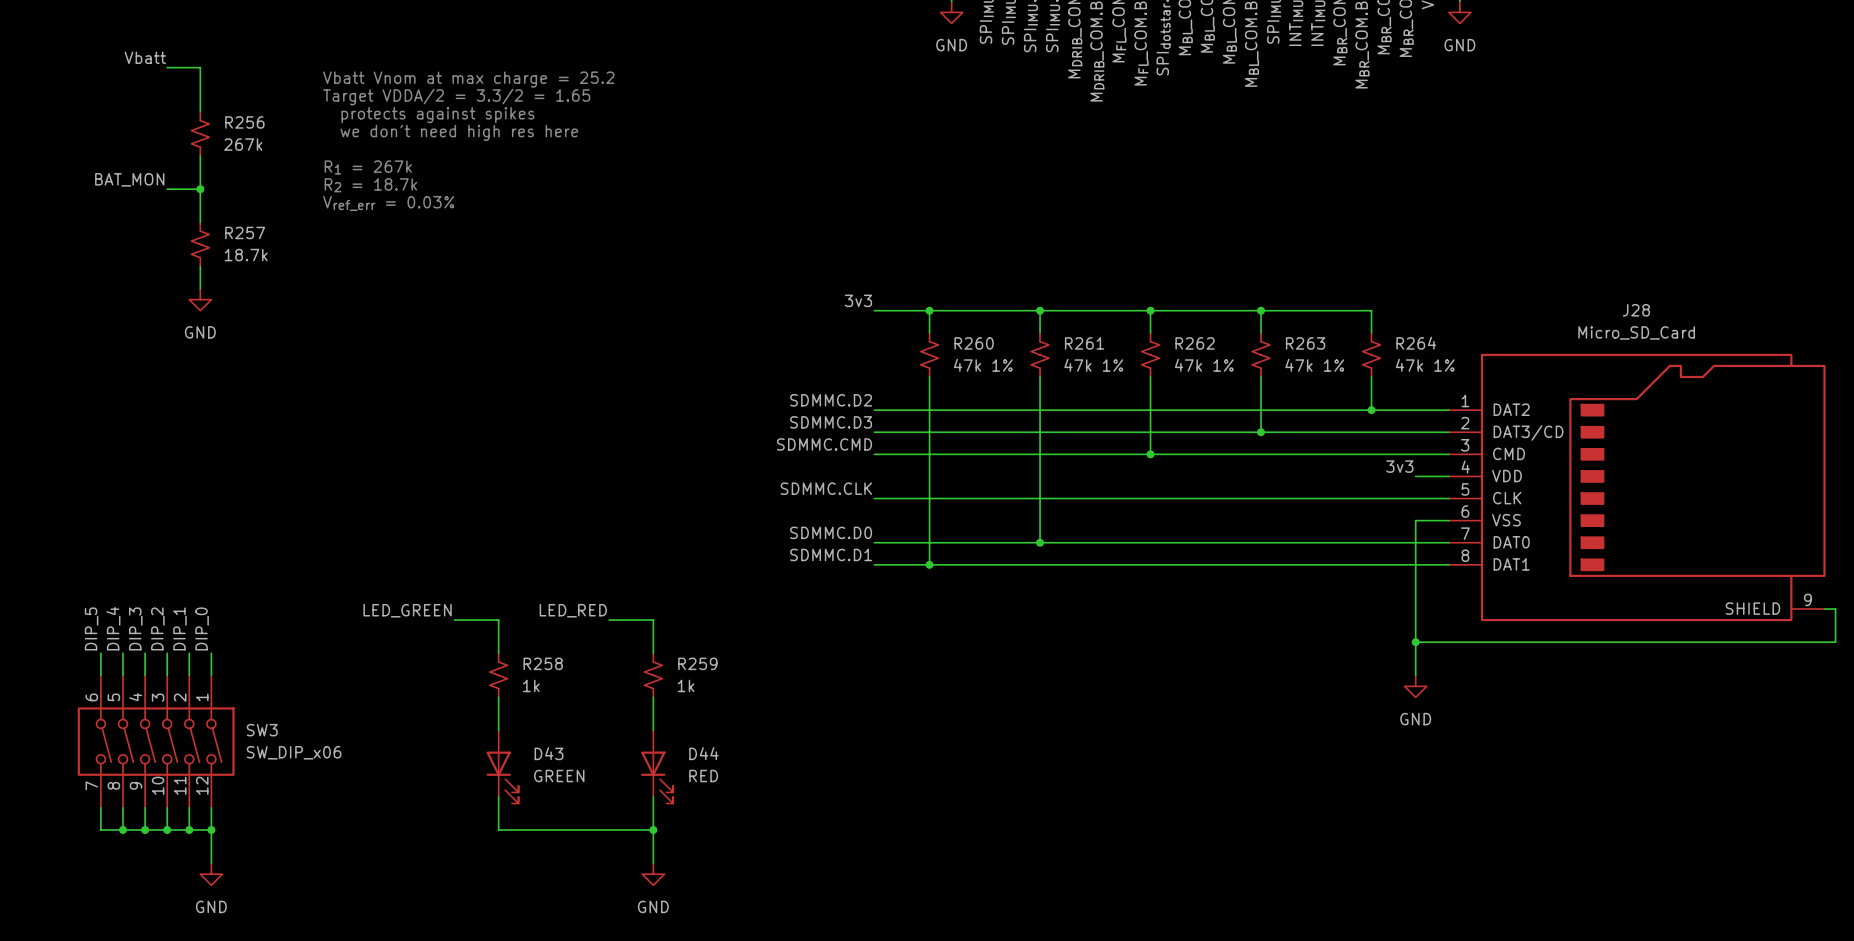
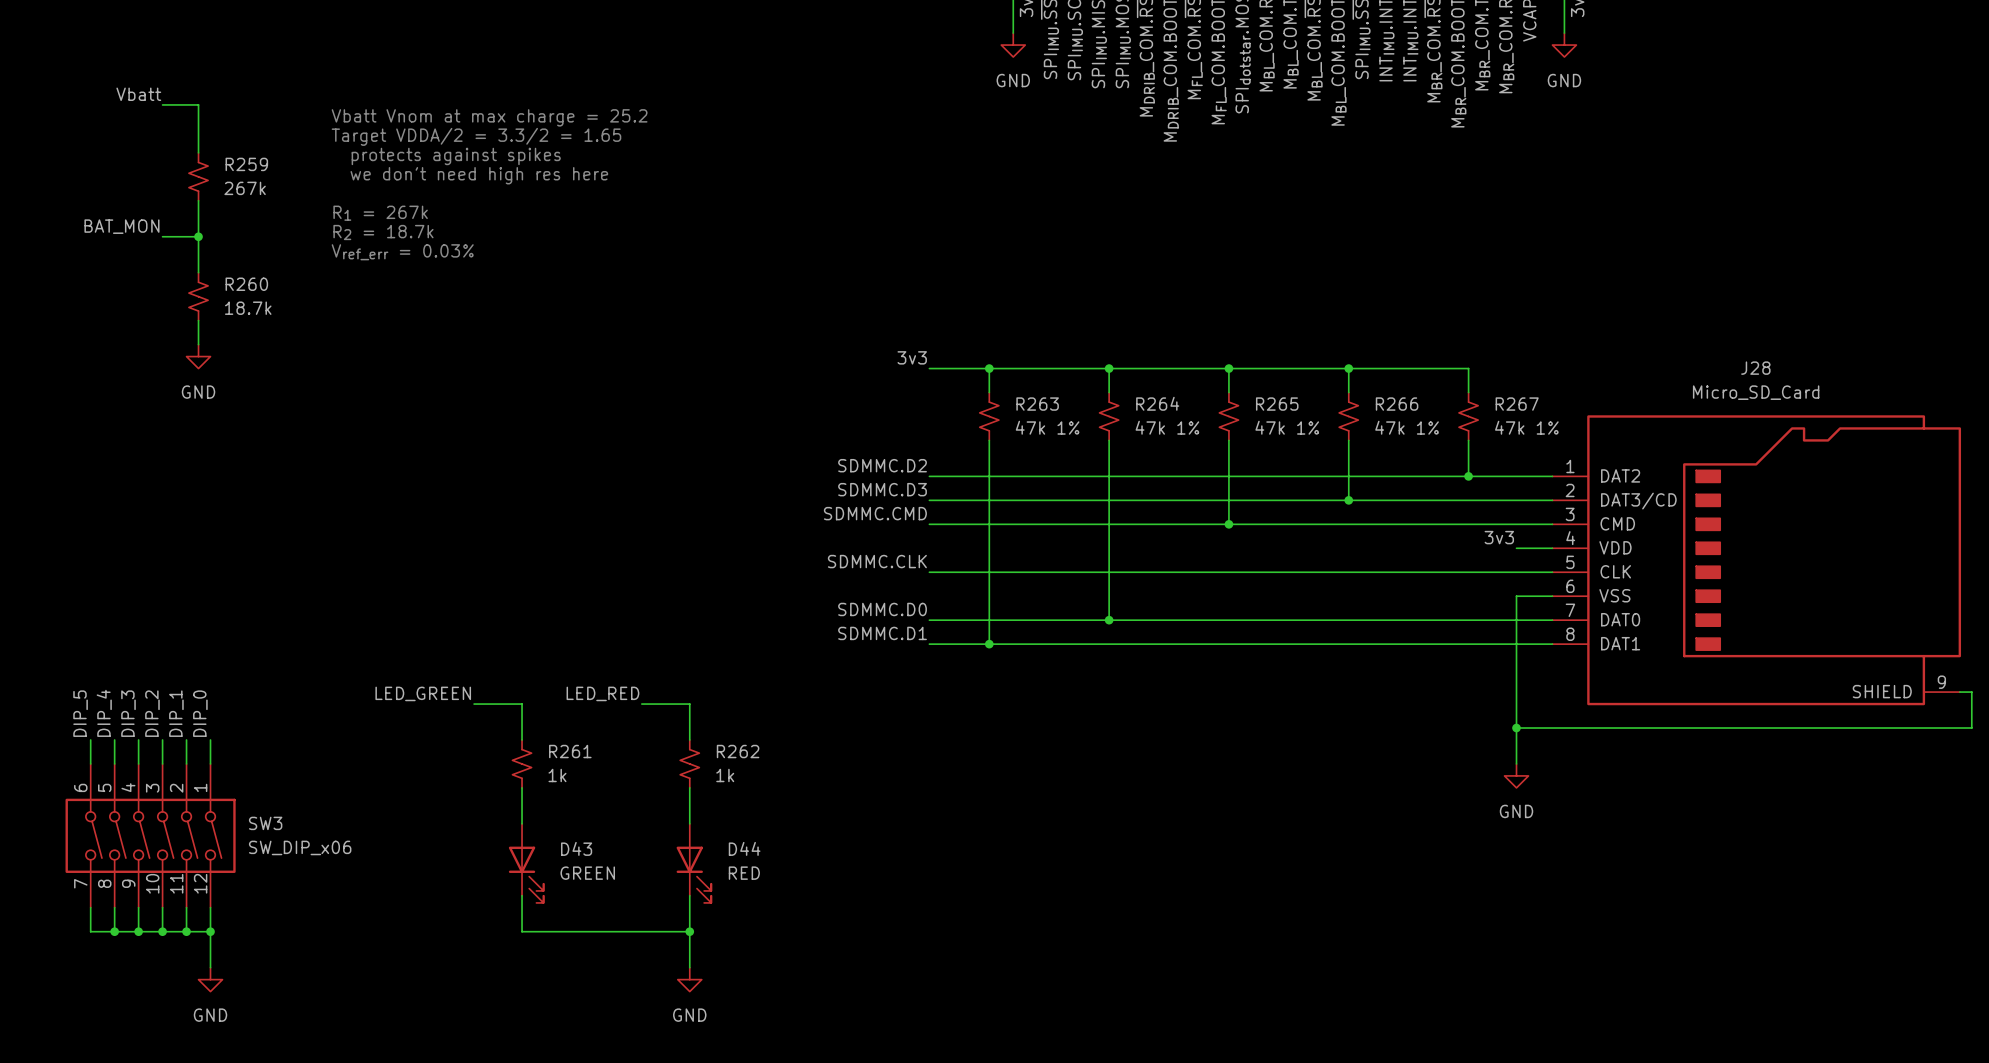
R256 name: R256 (244, 122) -> R259 (246, 164)
R257 name: R257 (245, 232) -> R260 (246, 284)
R260 name: R260 (974, 343) -> R263 (1037, 404)
R261 name: R261 (1084, 343) -> R264 (1157, 403)
R262 name: R262 (1195, 343) -> R265 (1277, 404)
R263 name: R263 (1305, 343) -> R266 (1397, 404)
R264 name: R264 (1416, 343) -> R267 (1517, 404)
R258 name: R258 (543, 663) -> R261 (570, 751)
R259 name: R259 (697, 663) -> R262 (738, 751)

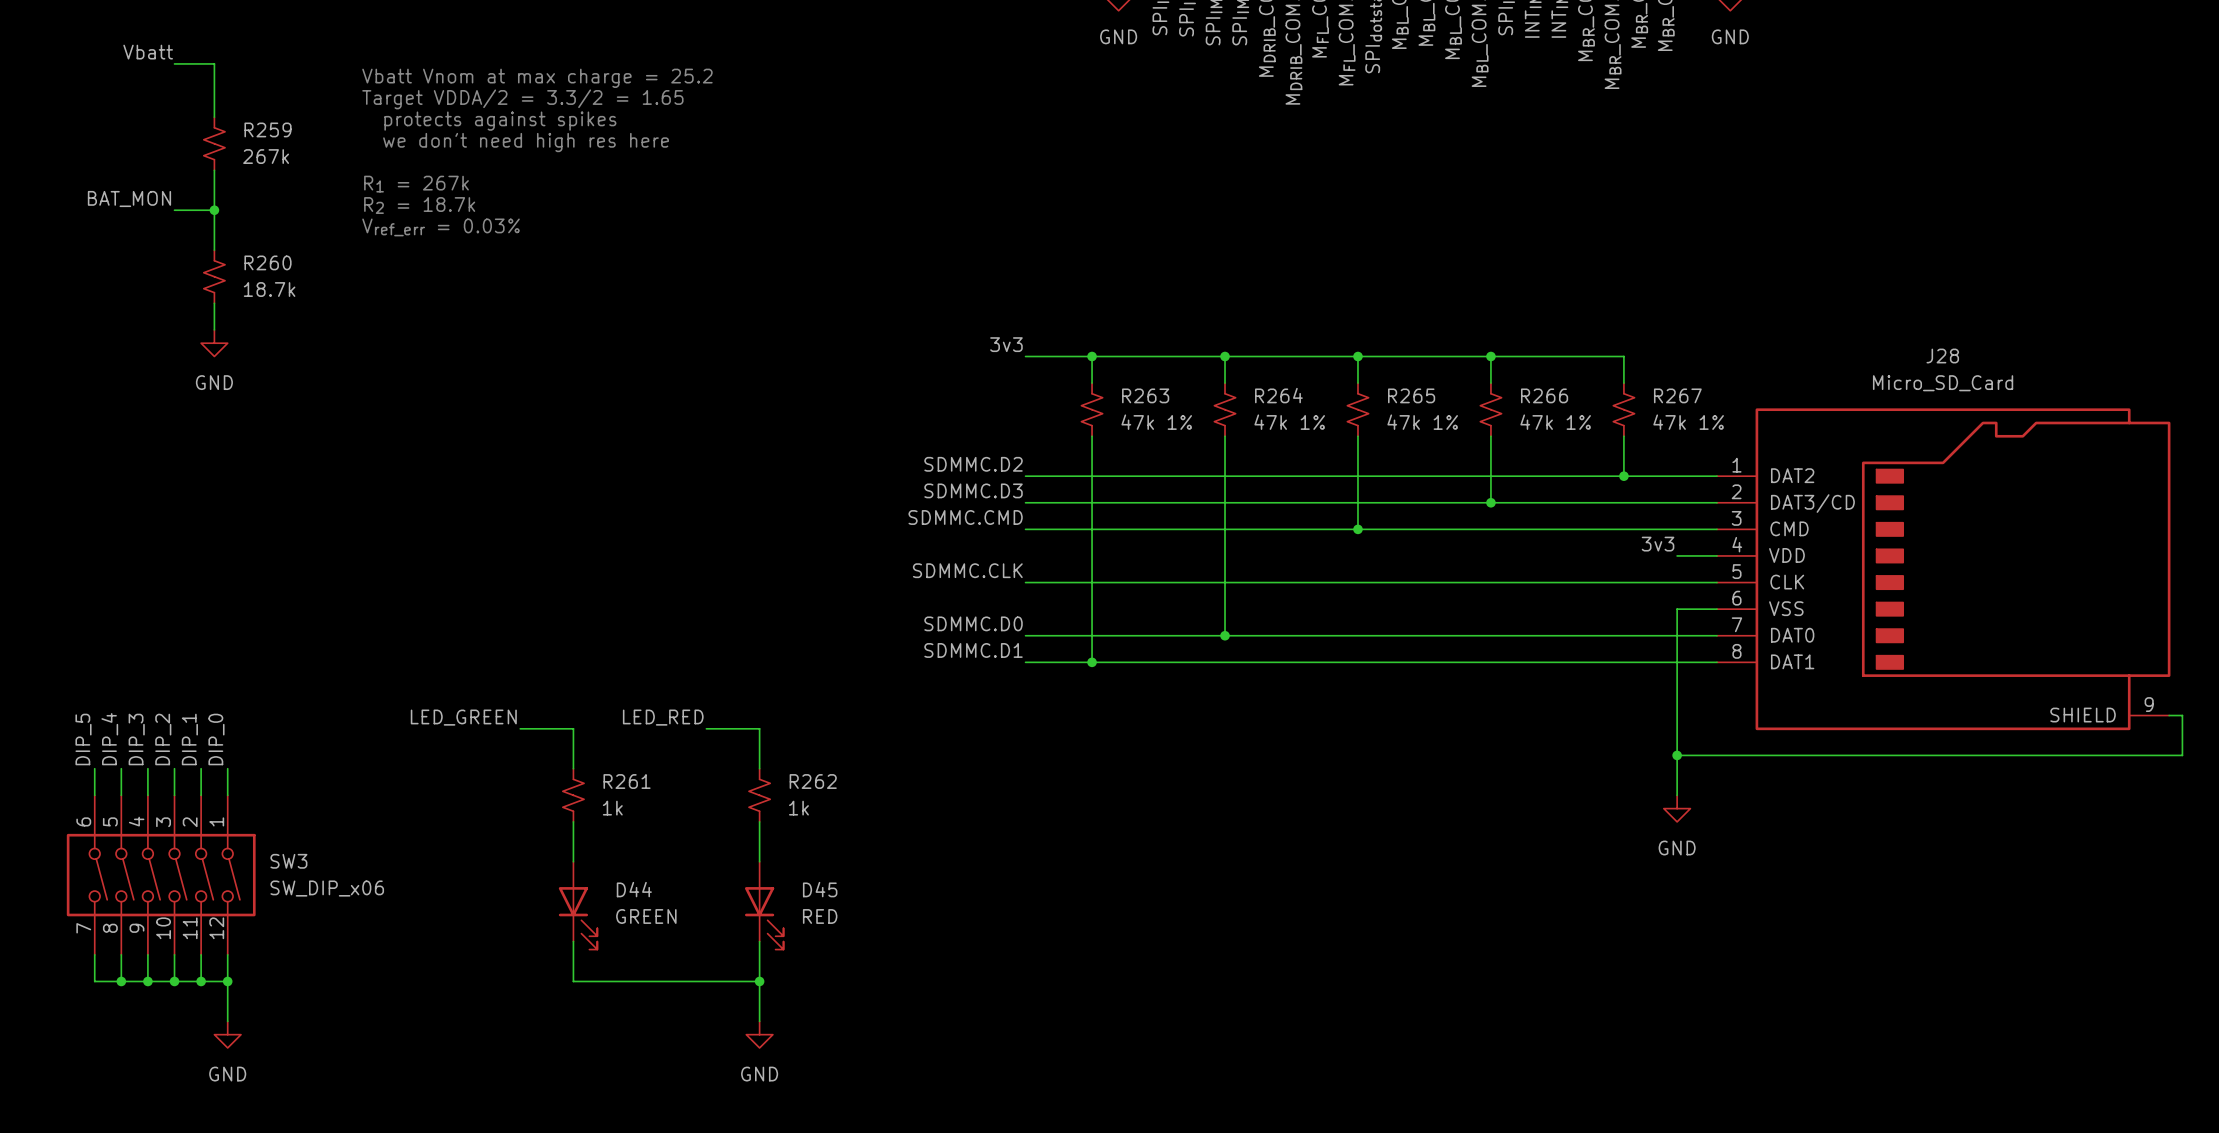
D43 name: D43 (576, 848) -> D44 (634, 889)
D44 name: D44 (744, 848) -> D45 (820, 889)

